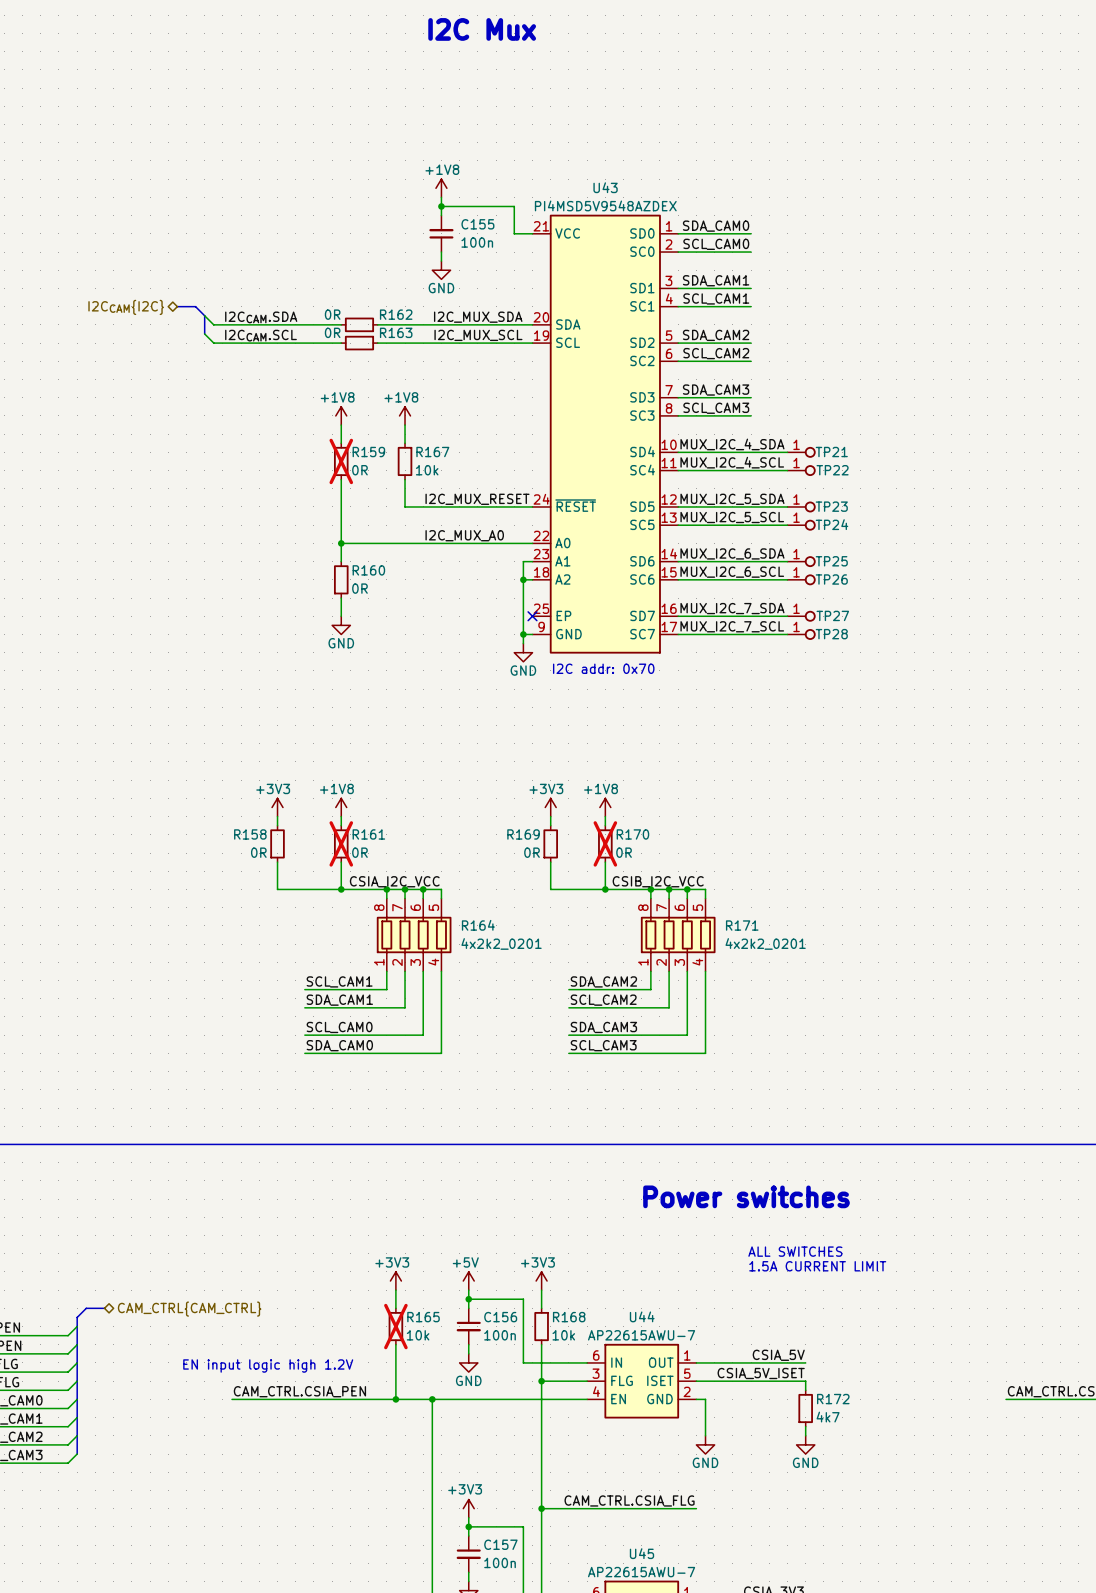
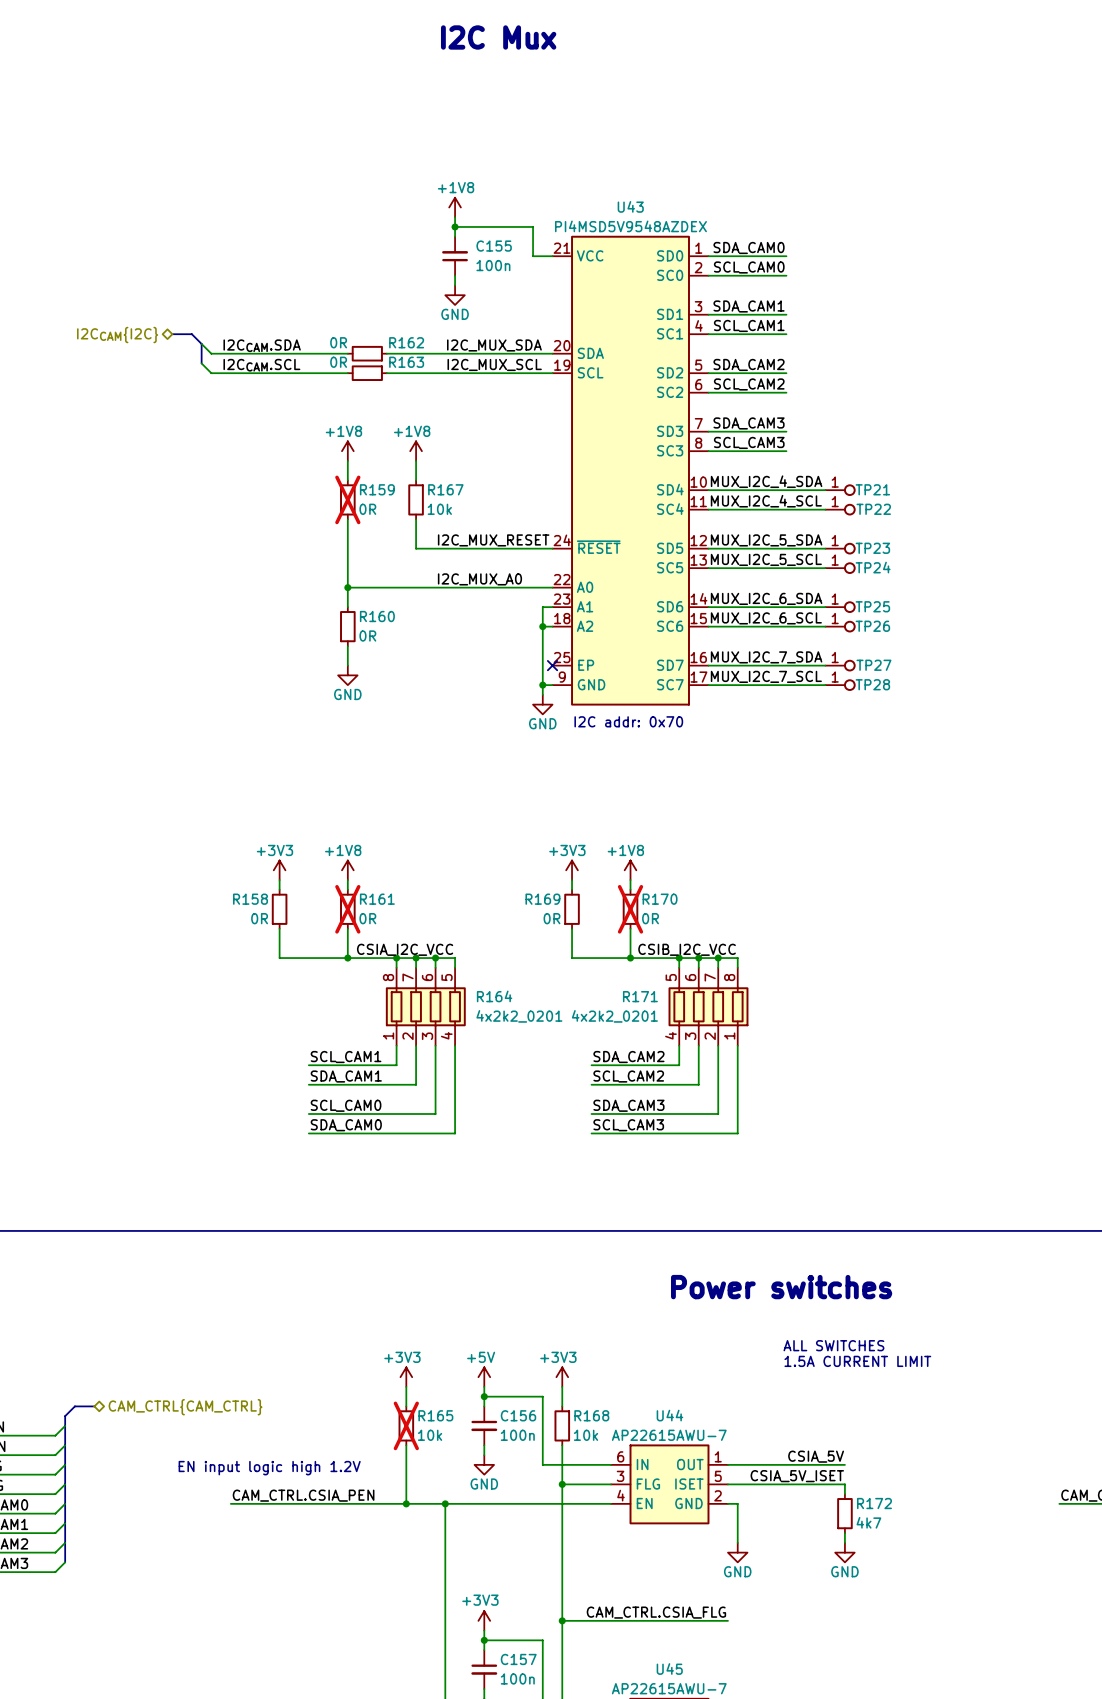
R171 flip: as is (678, 934) -> left-right (708, 1006)

